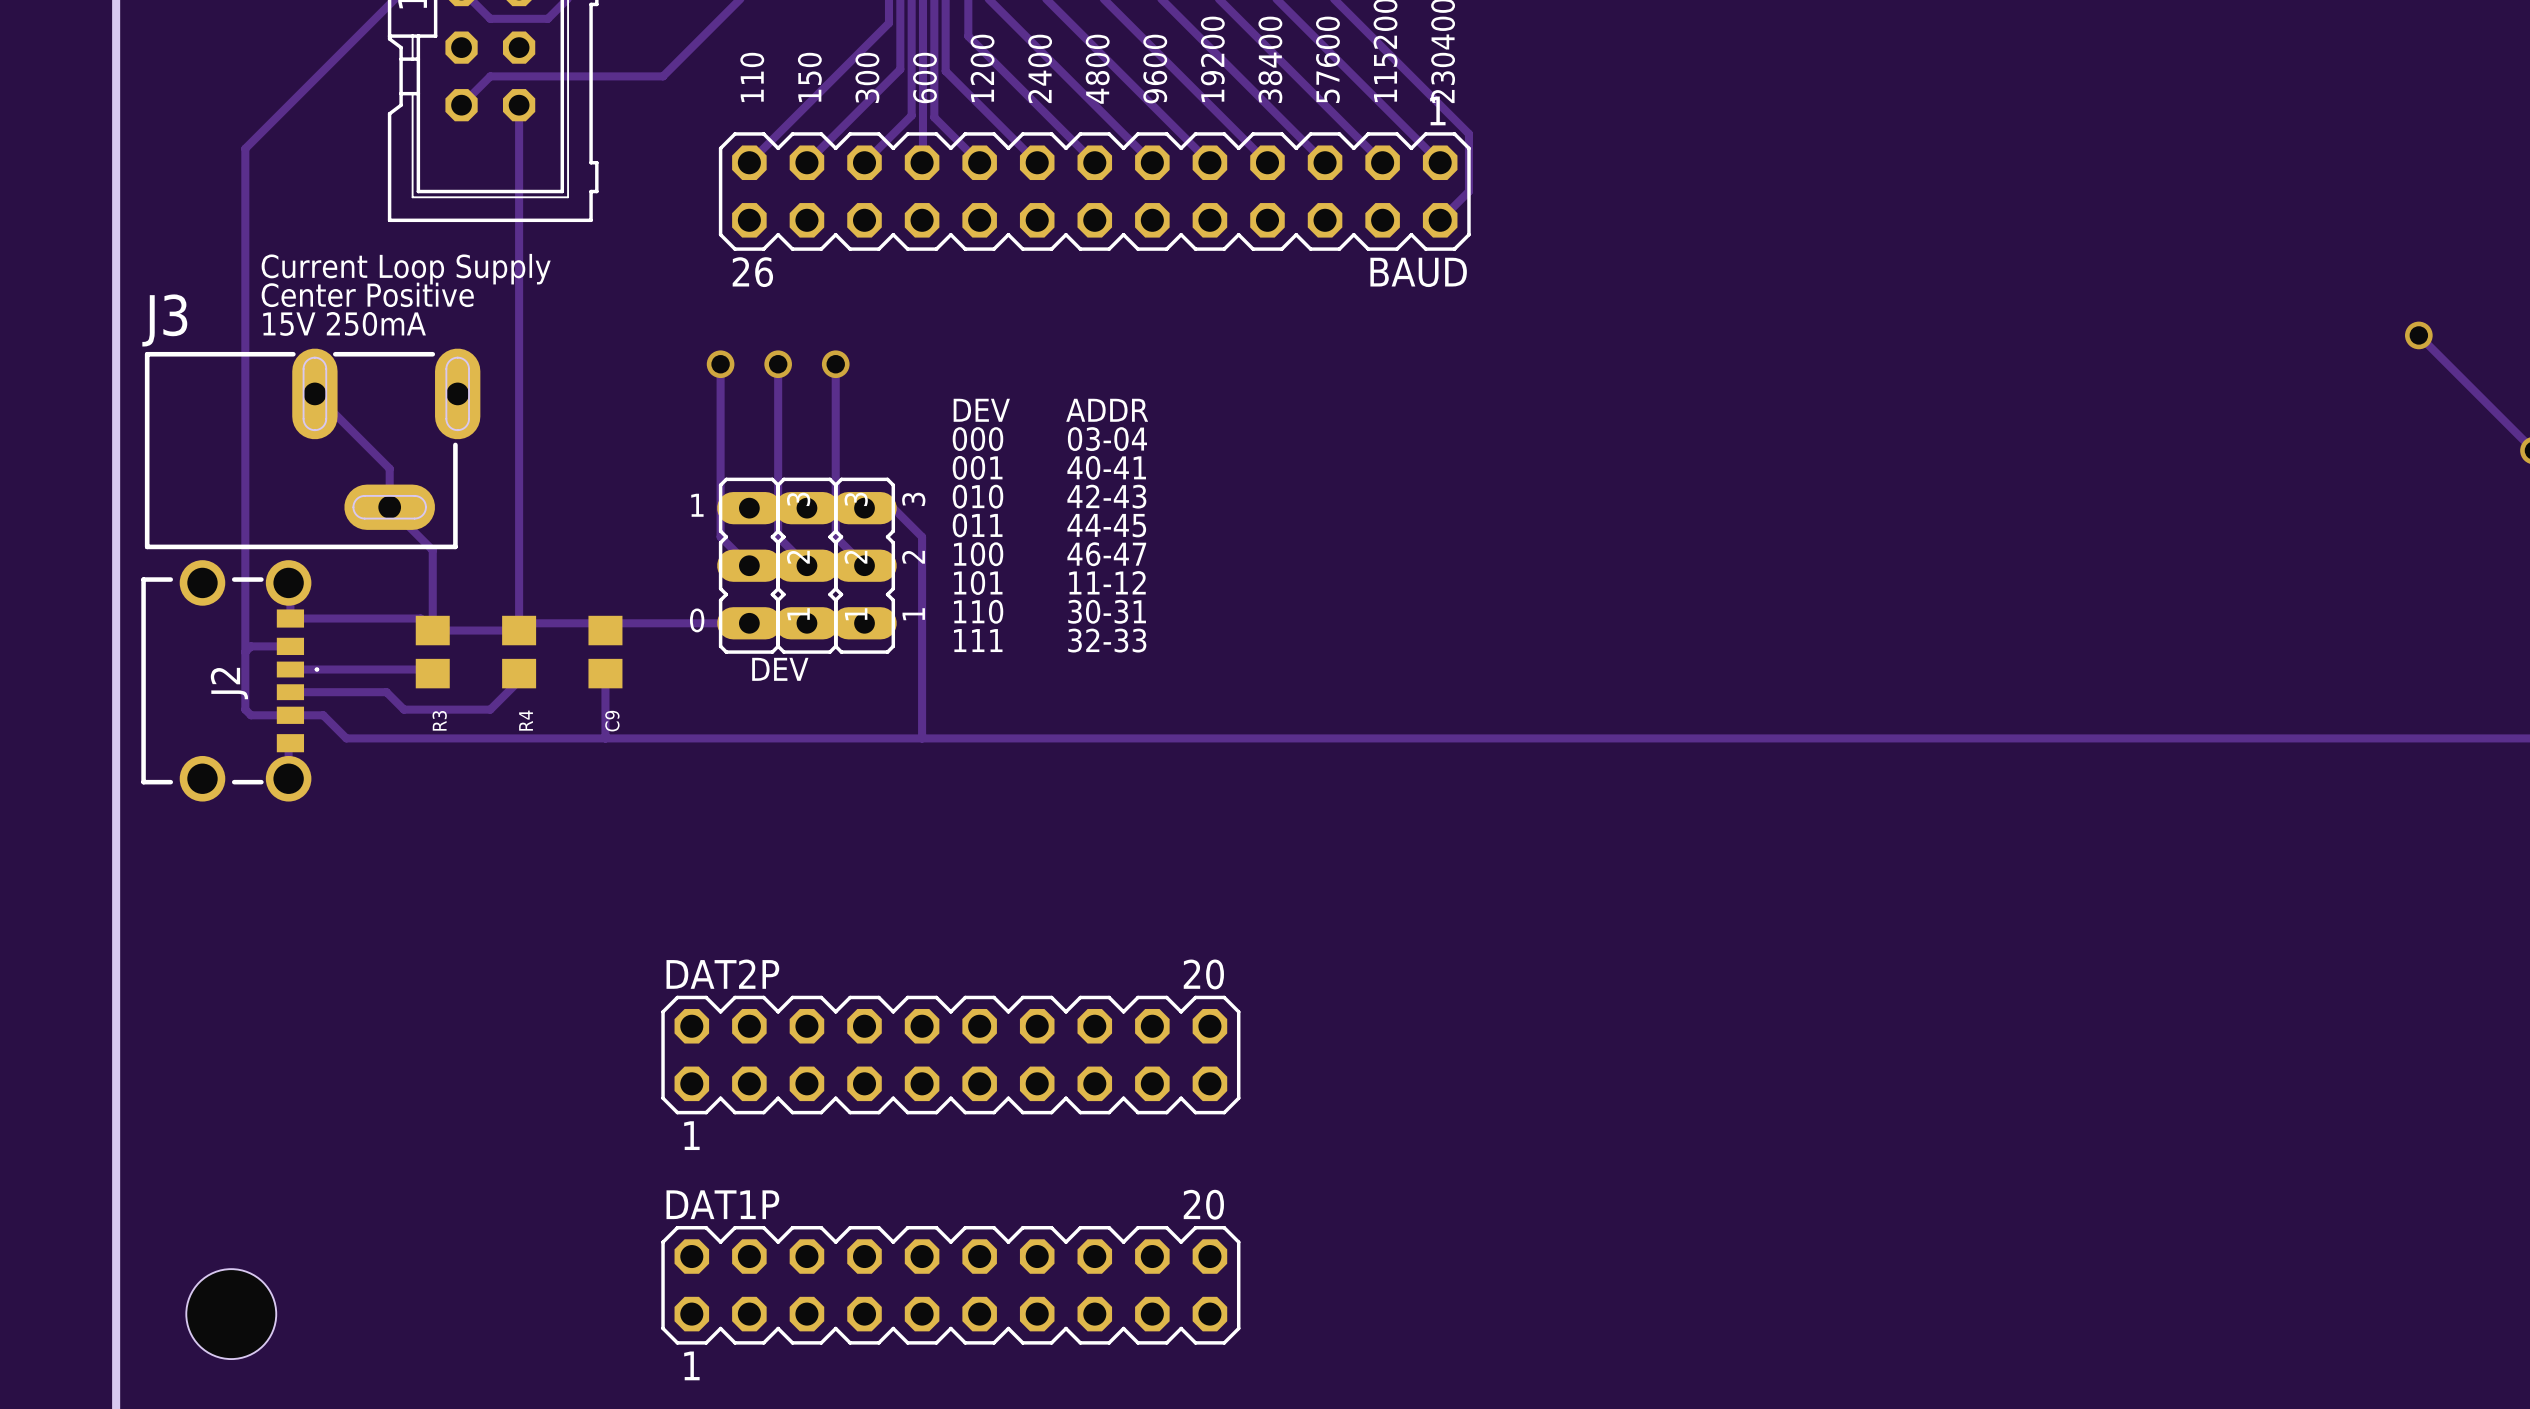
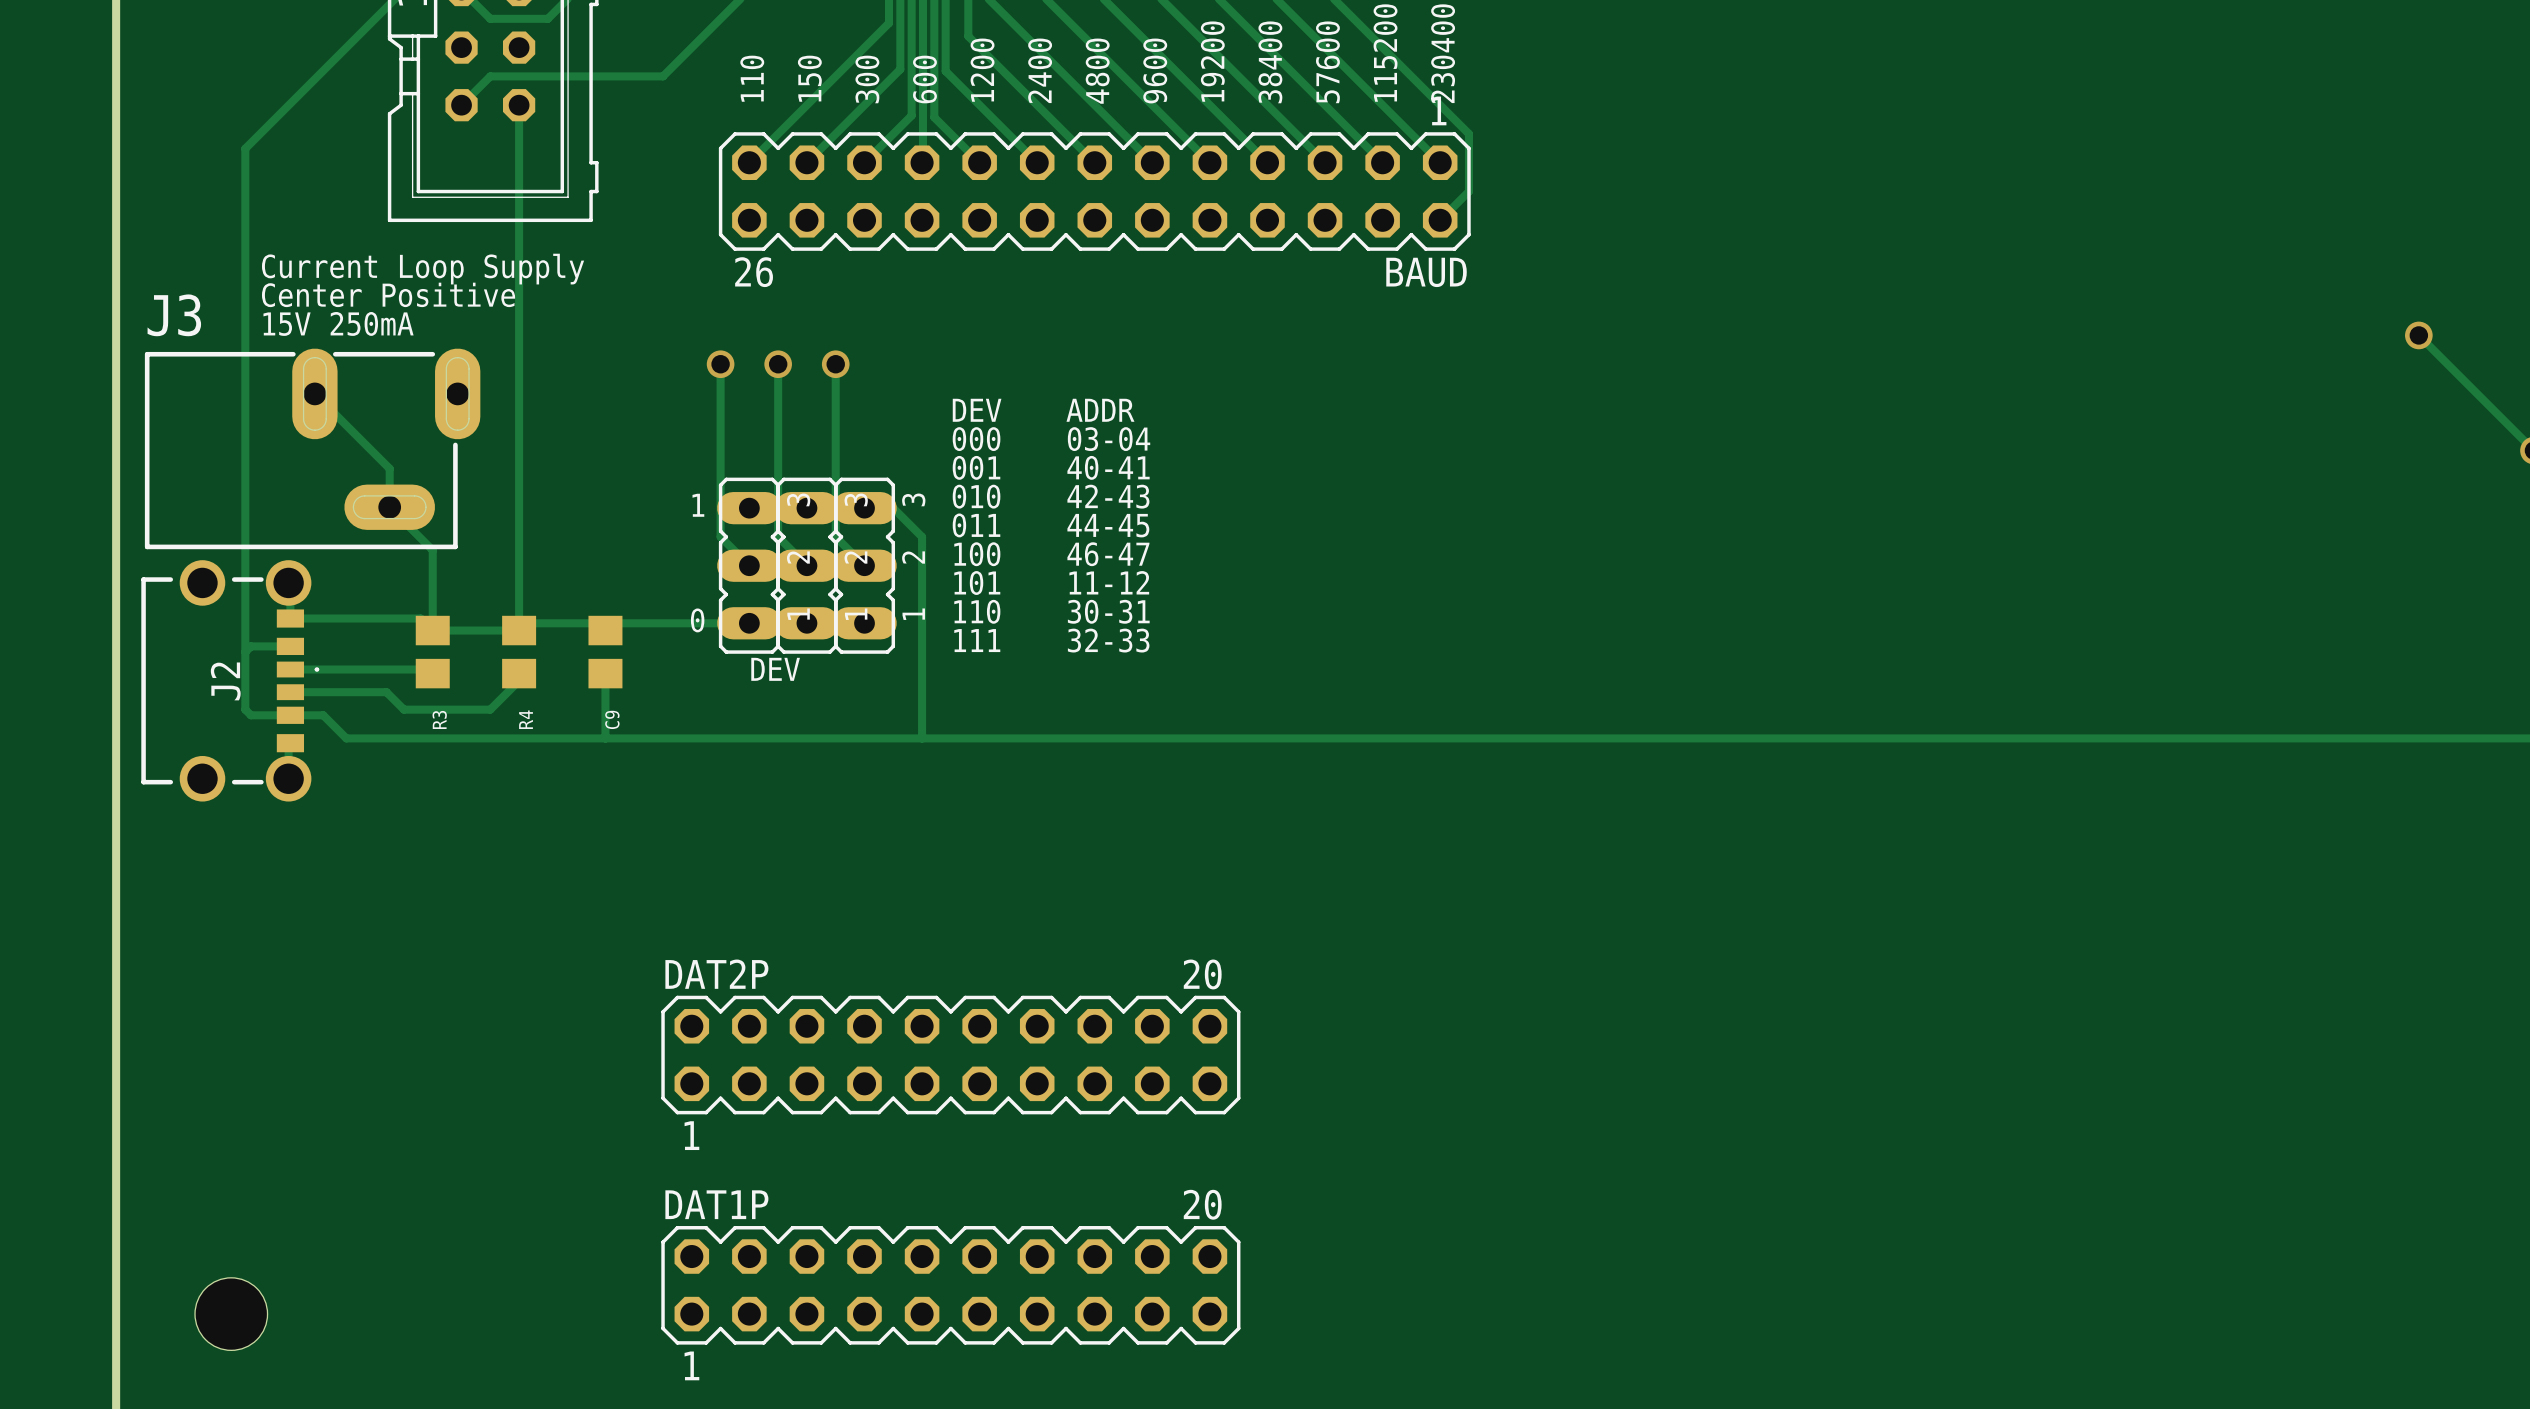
hole size: [186, 1269, 277, 1360] -> [195, 1277, 268, 1351]

